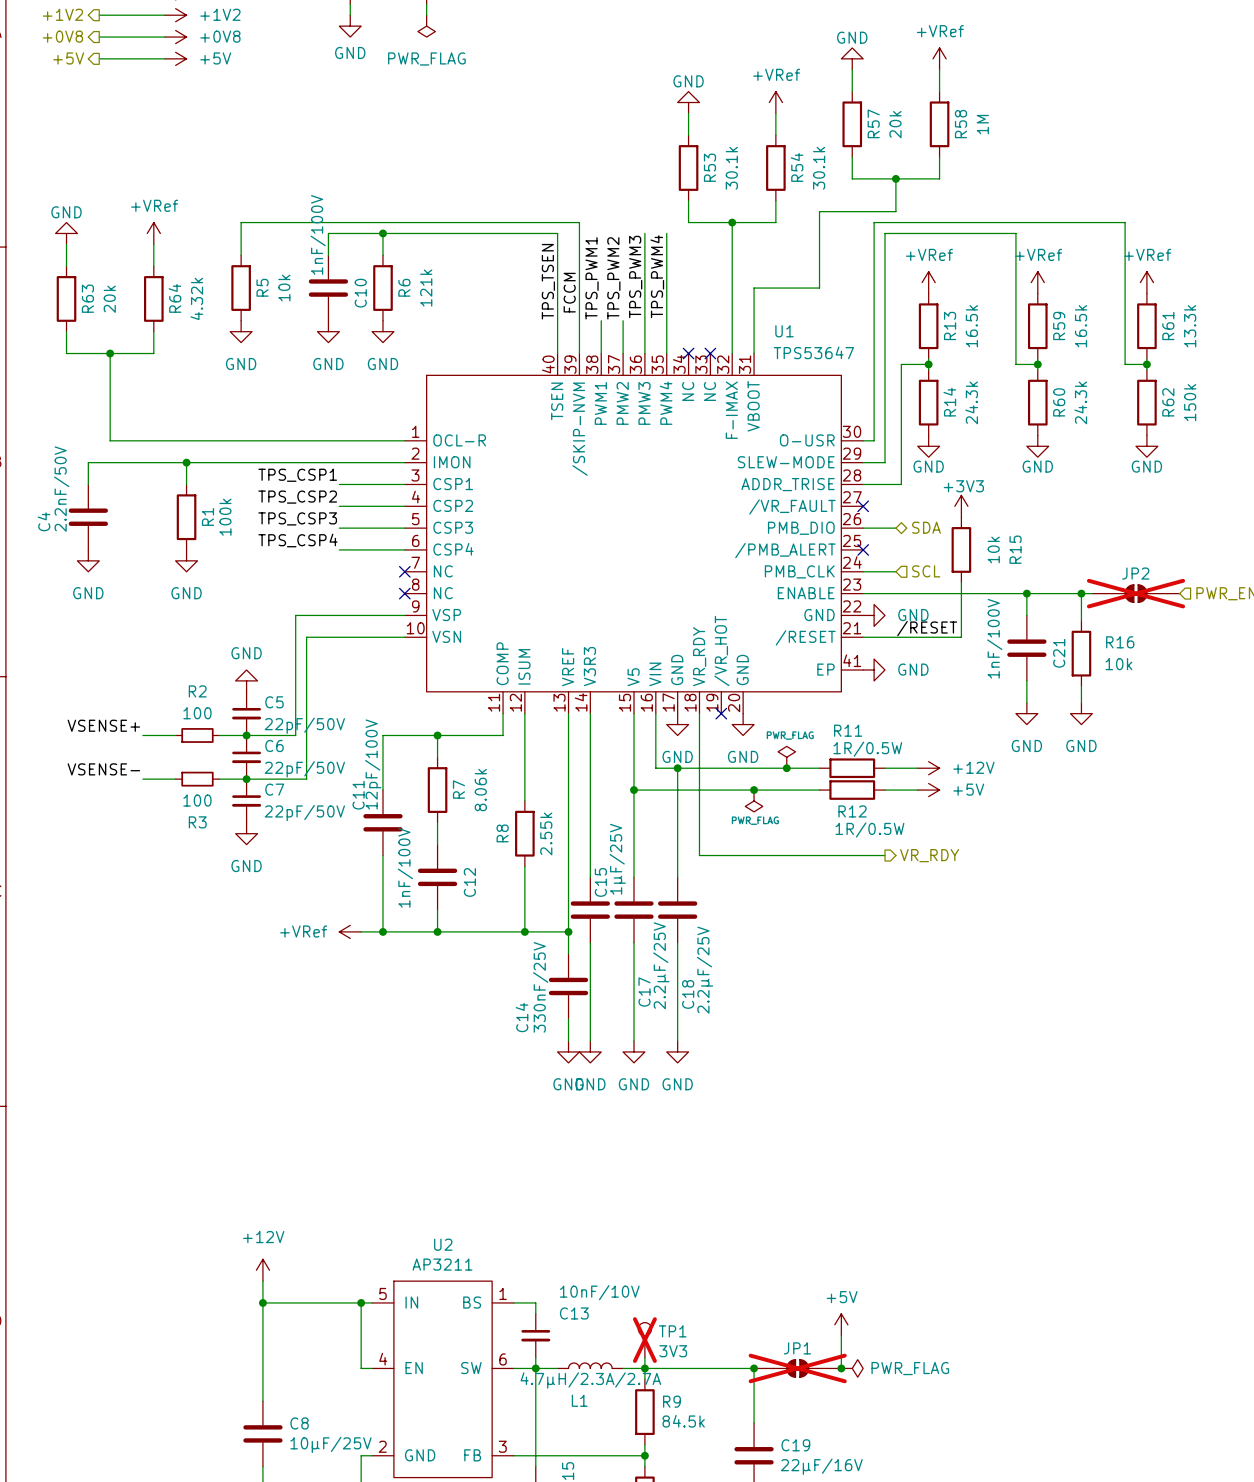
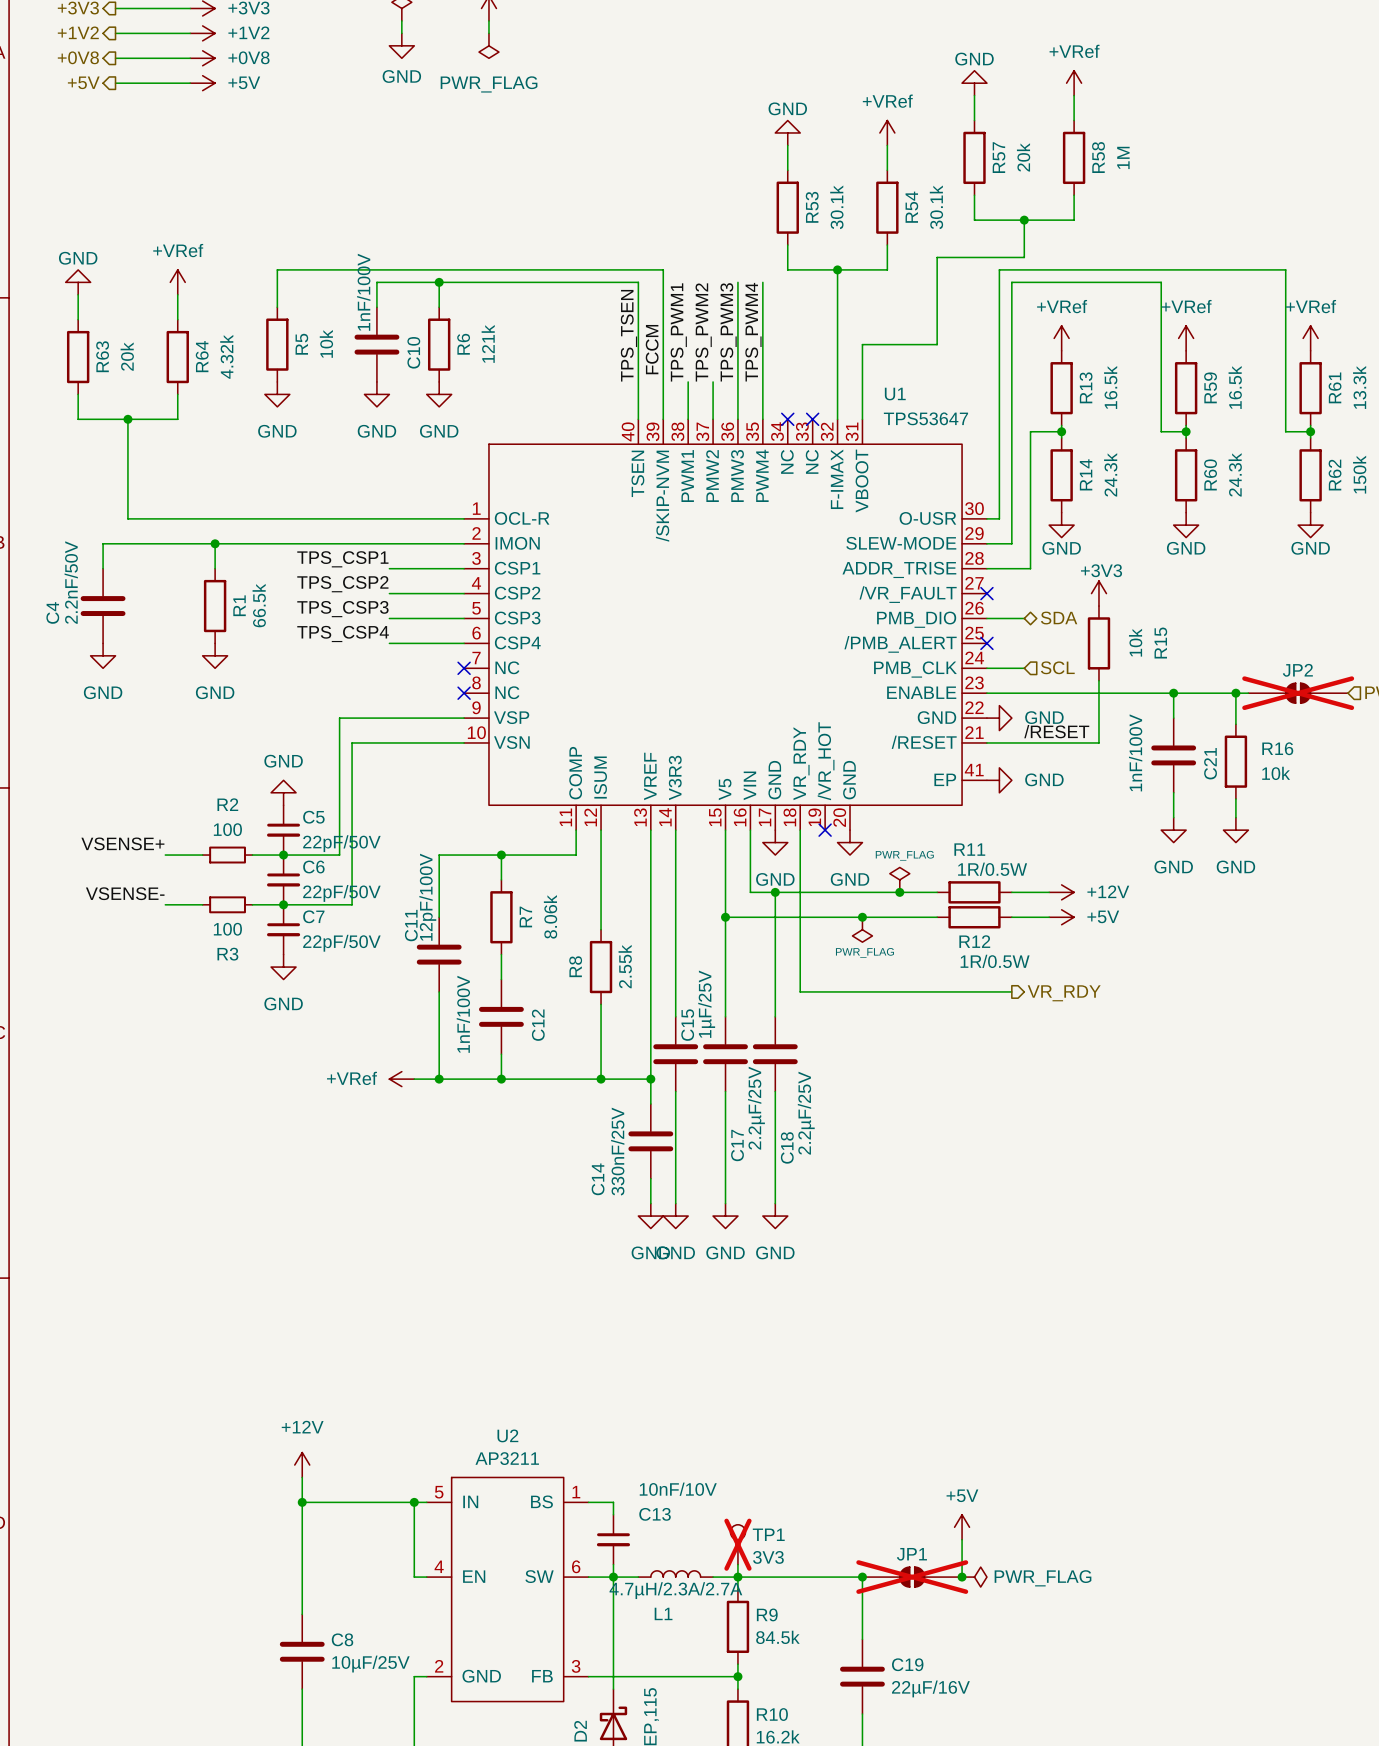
R1 value: 100k (225, 517) -> 66.5k (259, 605)

